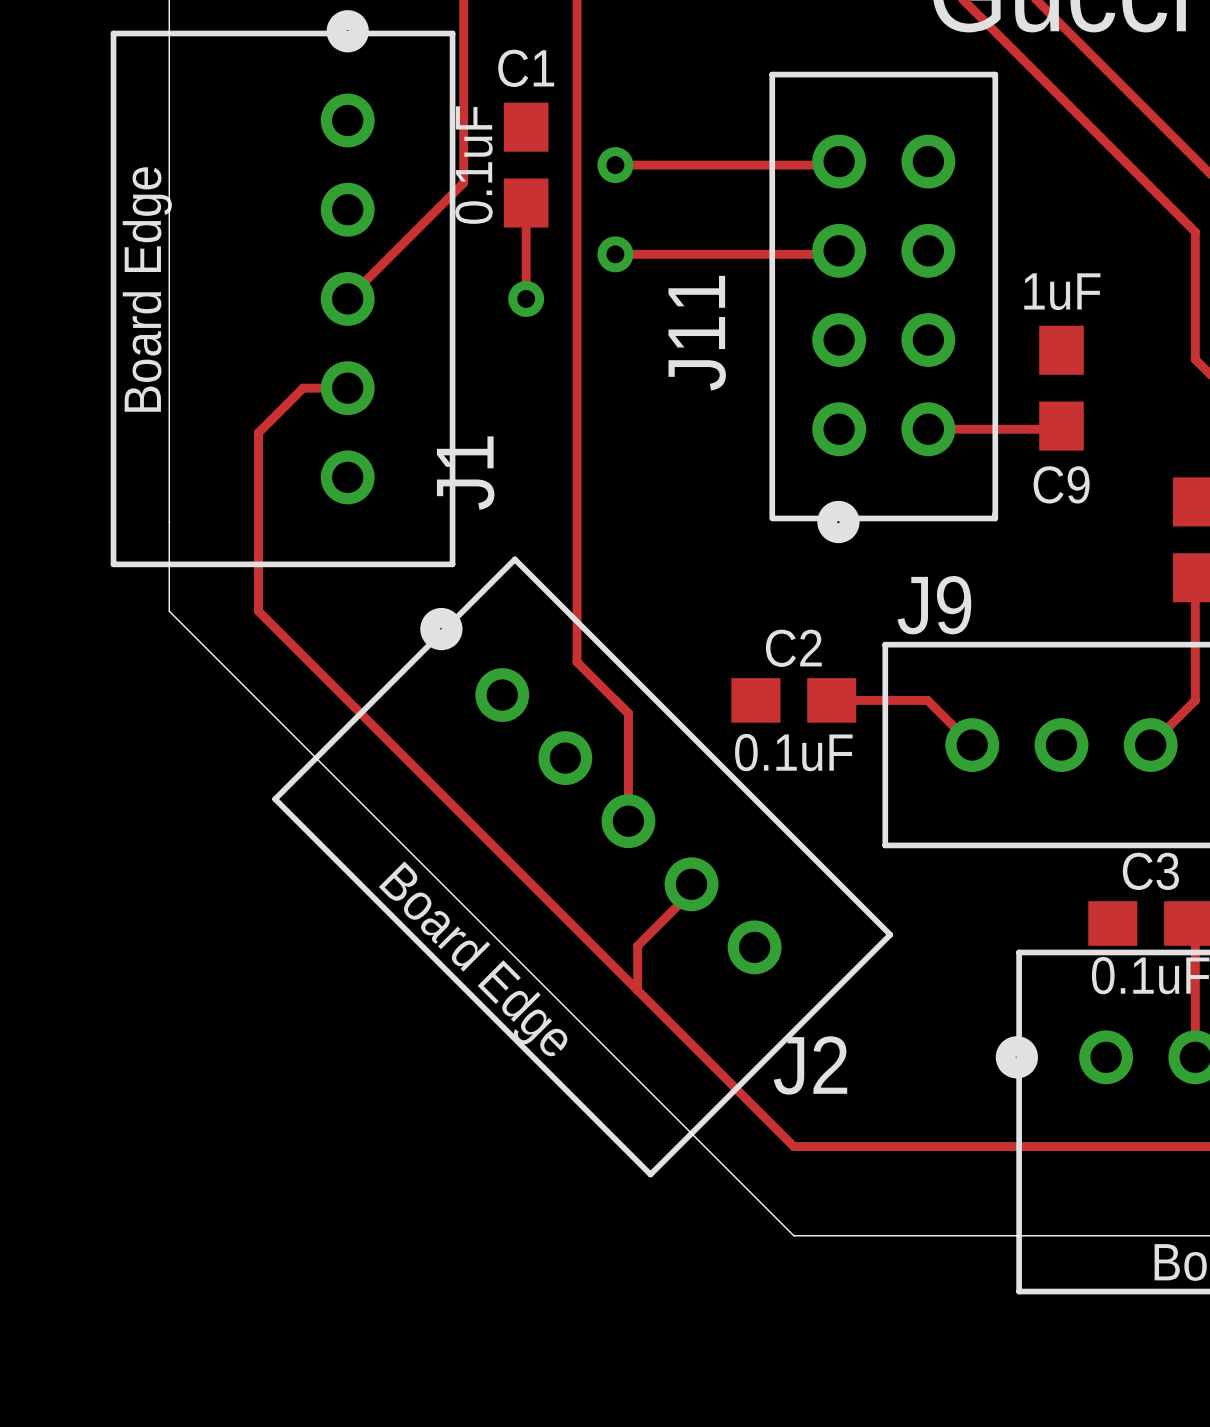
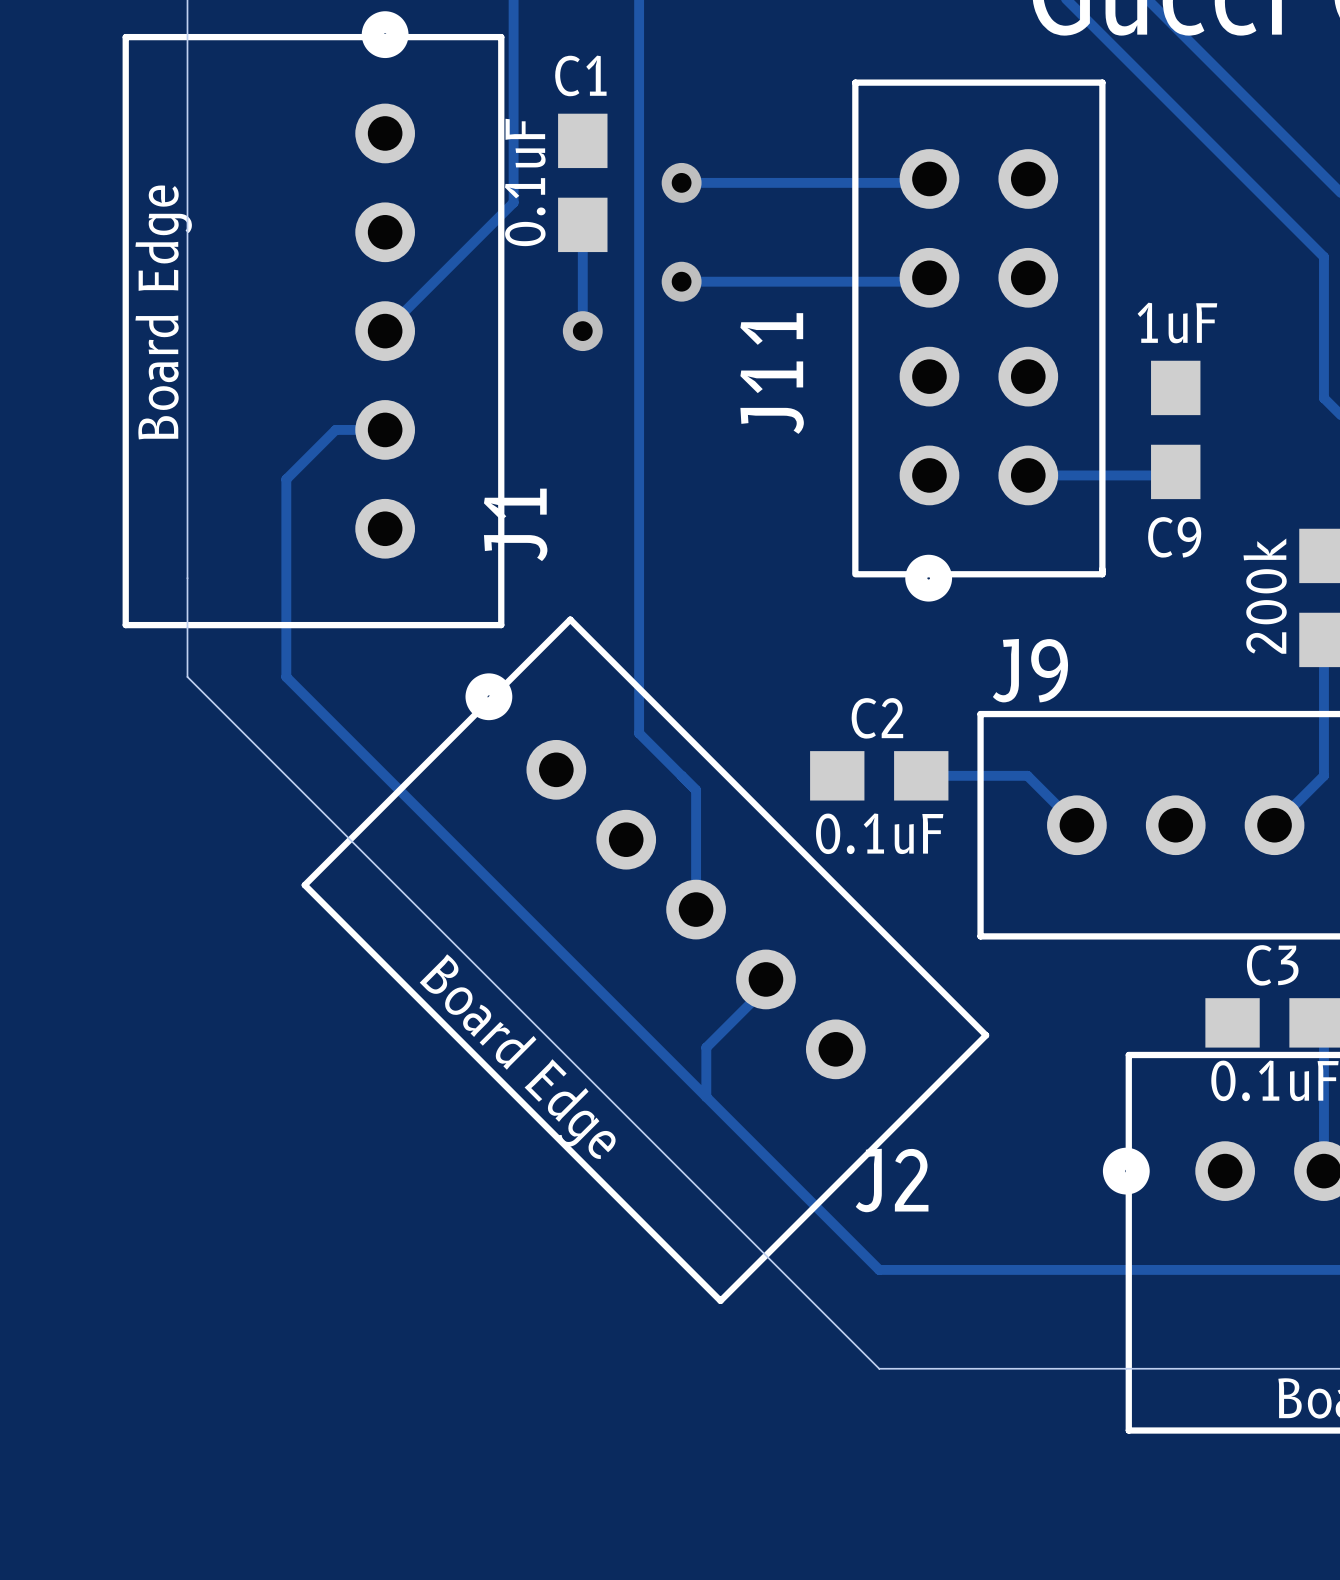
part value: none -> 200k (1265, 596)

